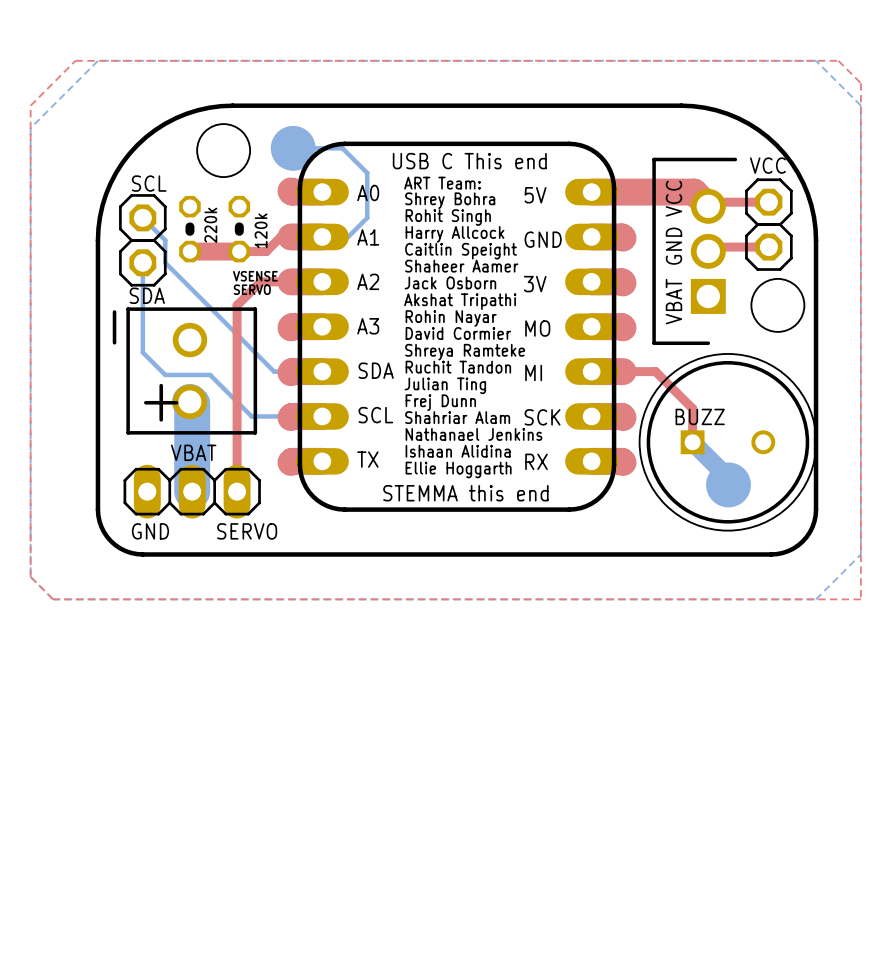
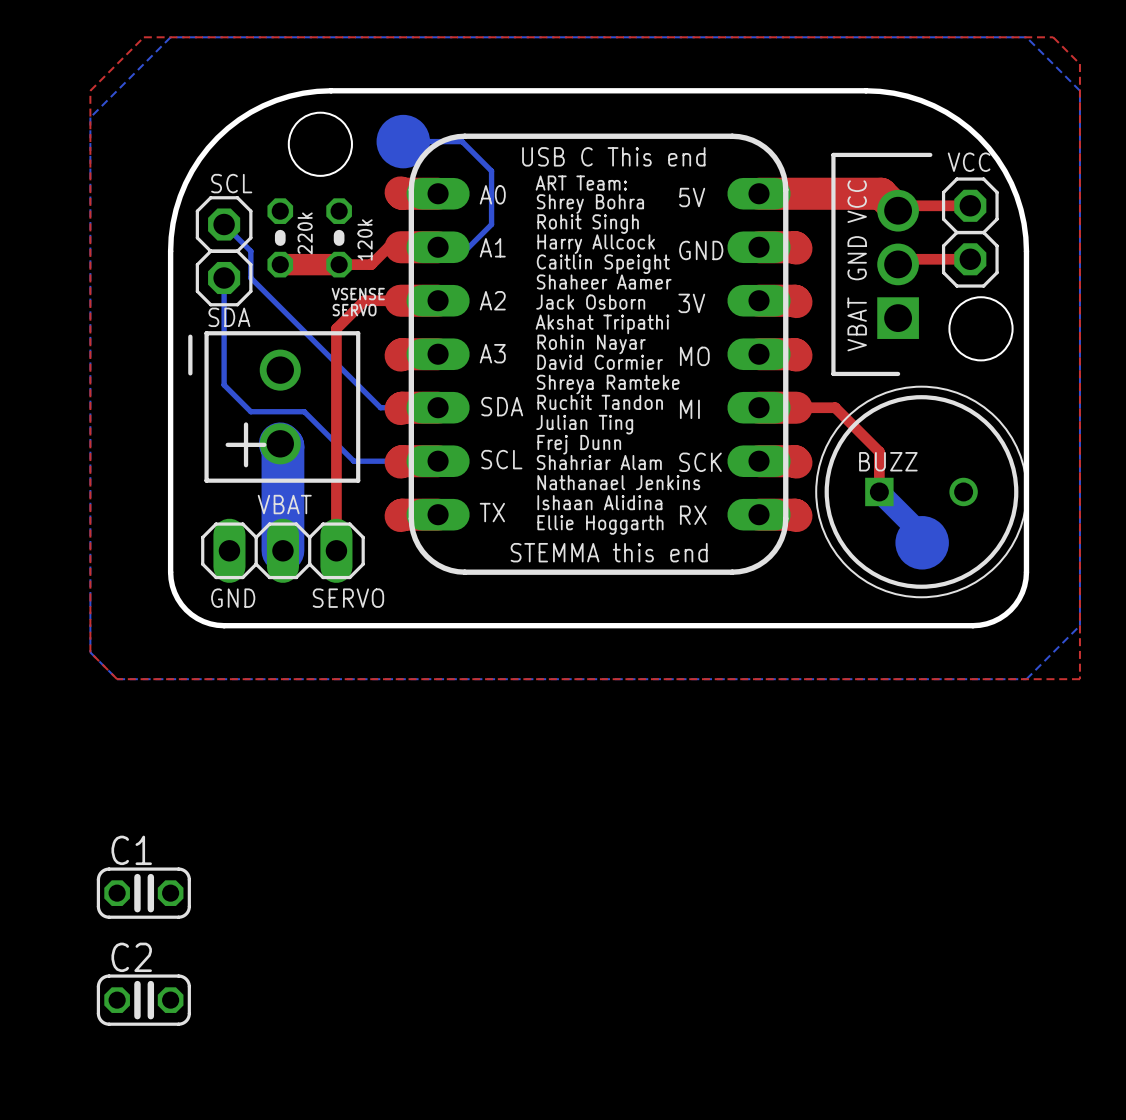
C1: none -> (143, 893)
C2: none -> (143, 1000)

